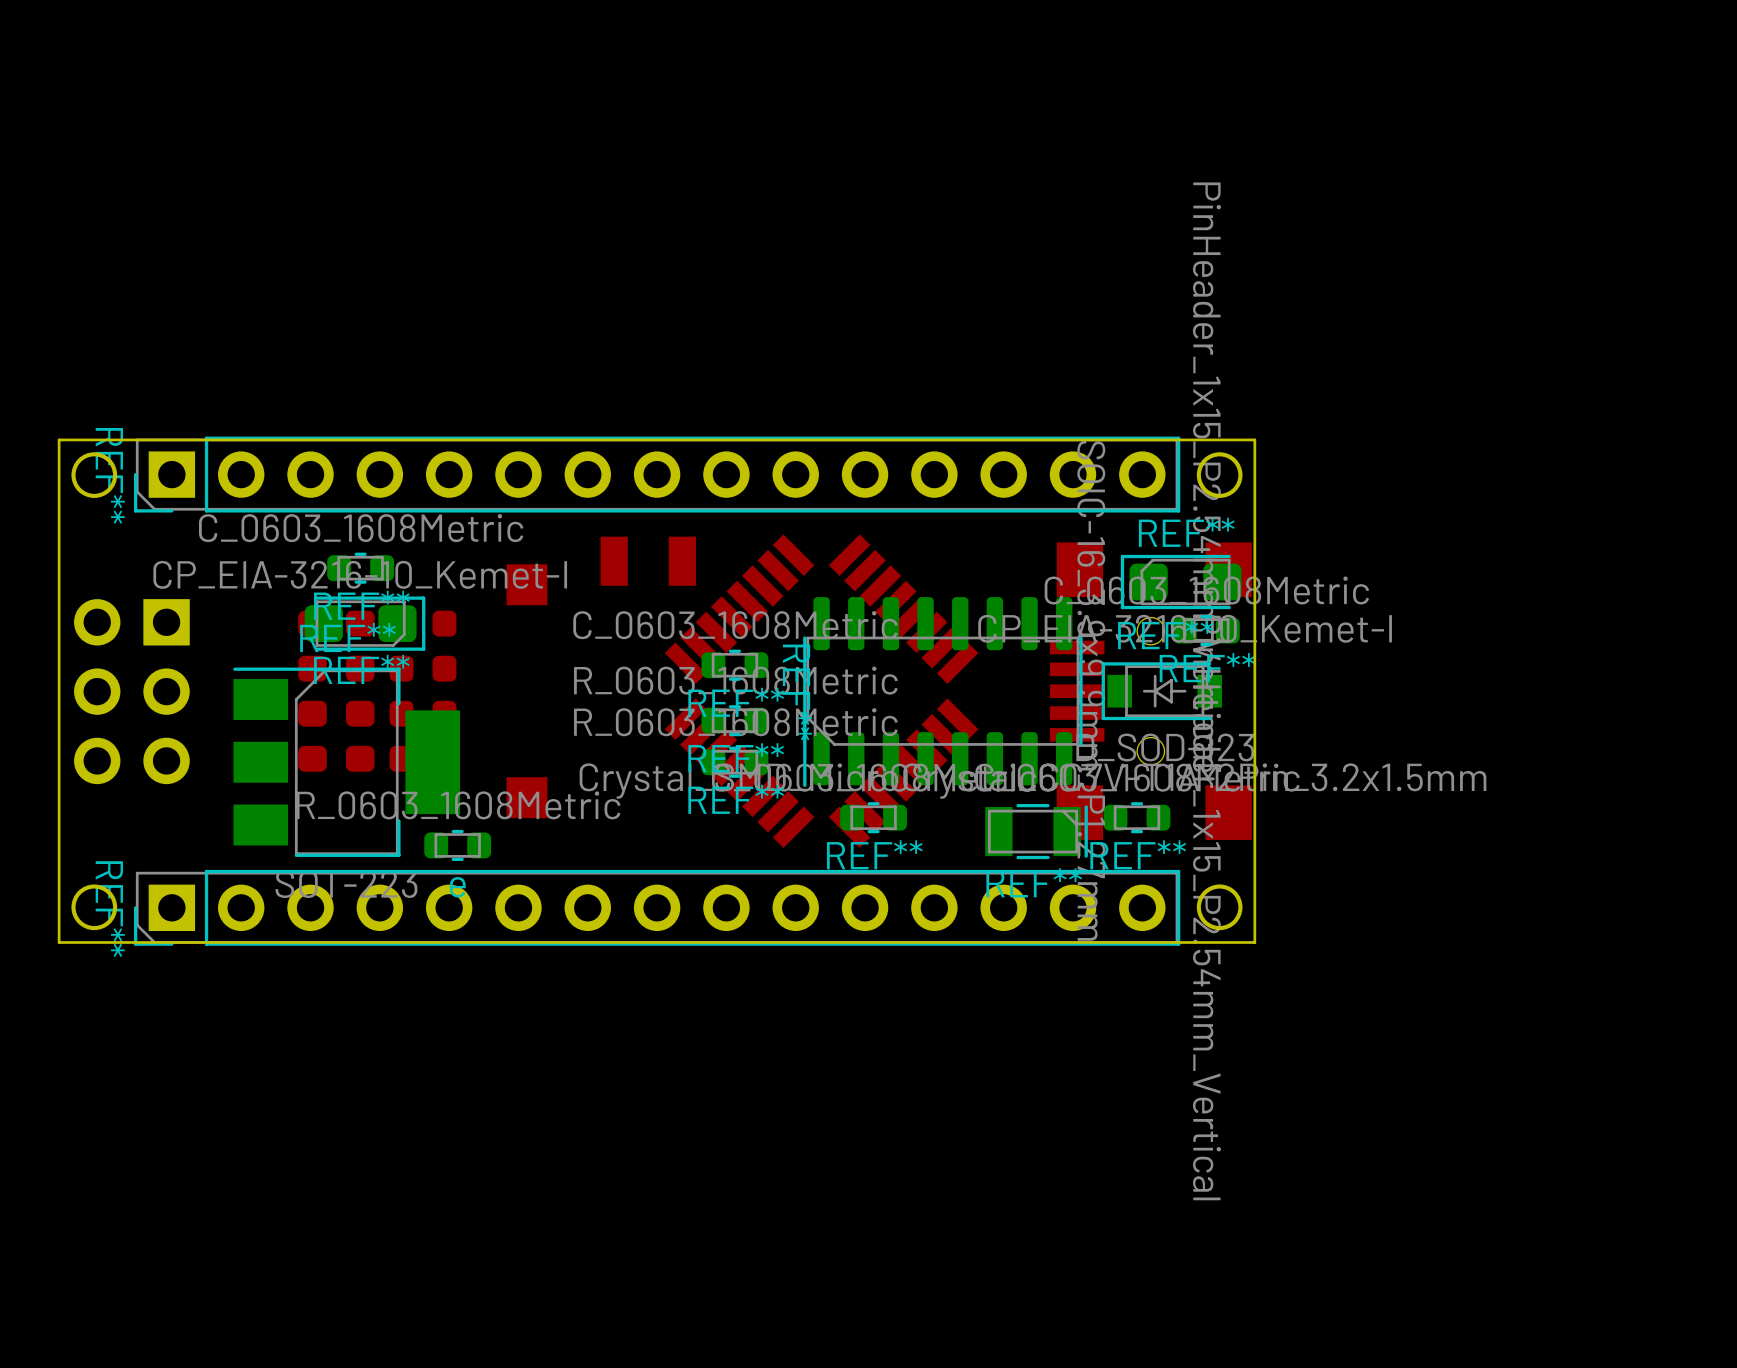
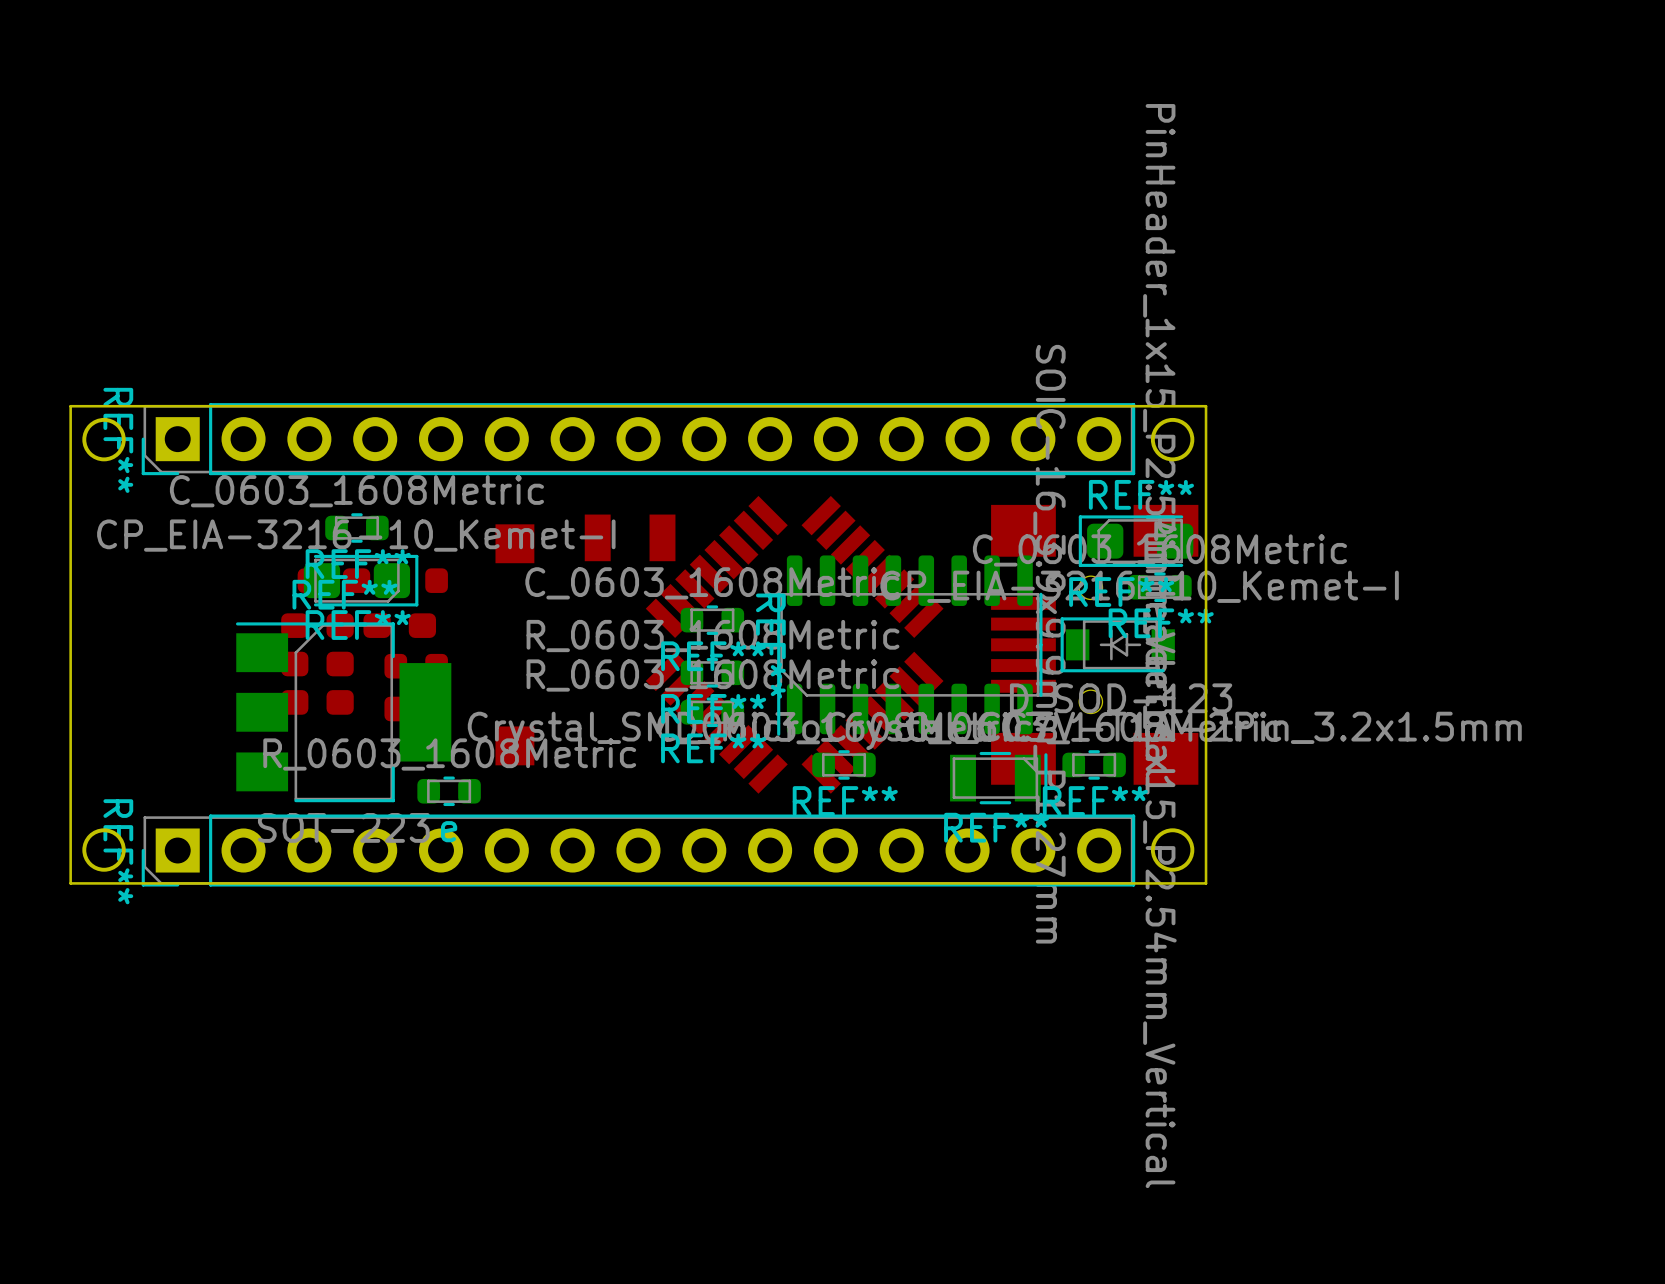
part footprint: [1049, 542, 1252, 840] -> [991, 504, 1199, 785]
part position: (648, 561) -> (630, 537)
part footprint: [389, 655, 457, 682] -> [363, 613, 437, 638]
part position: (336, 668) -> (317, 625)
part: (131, 691) -> none
part position: (336, 713) -> (317, 664)
part position: (336, 758) -> (317, 702)

